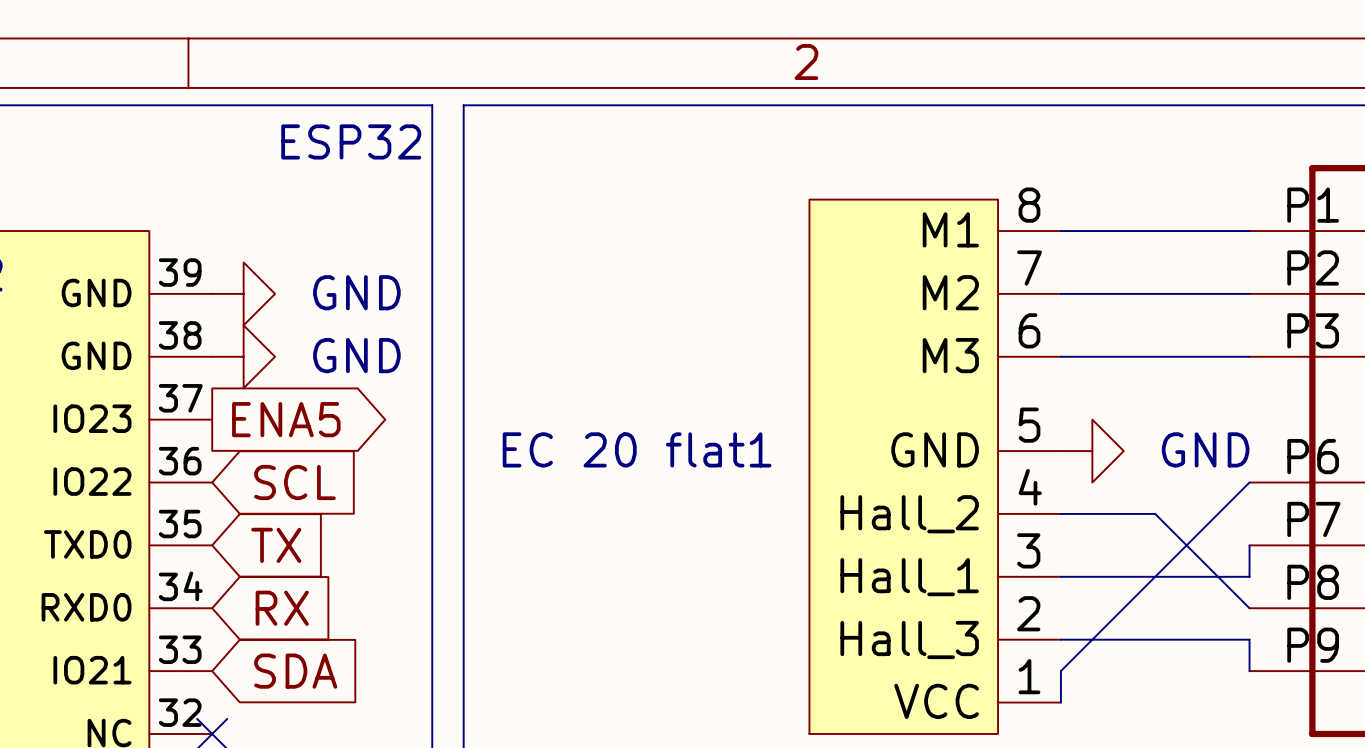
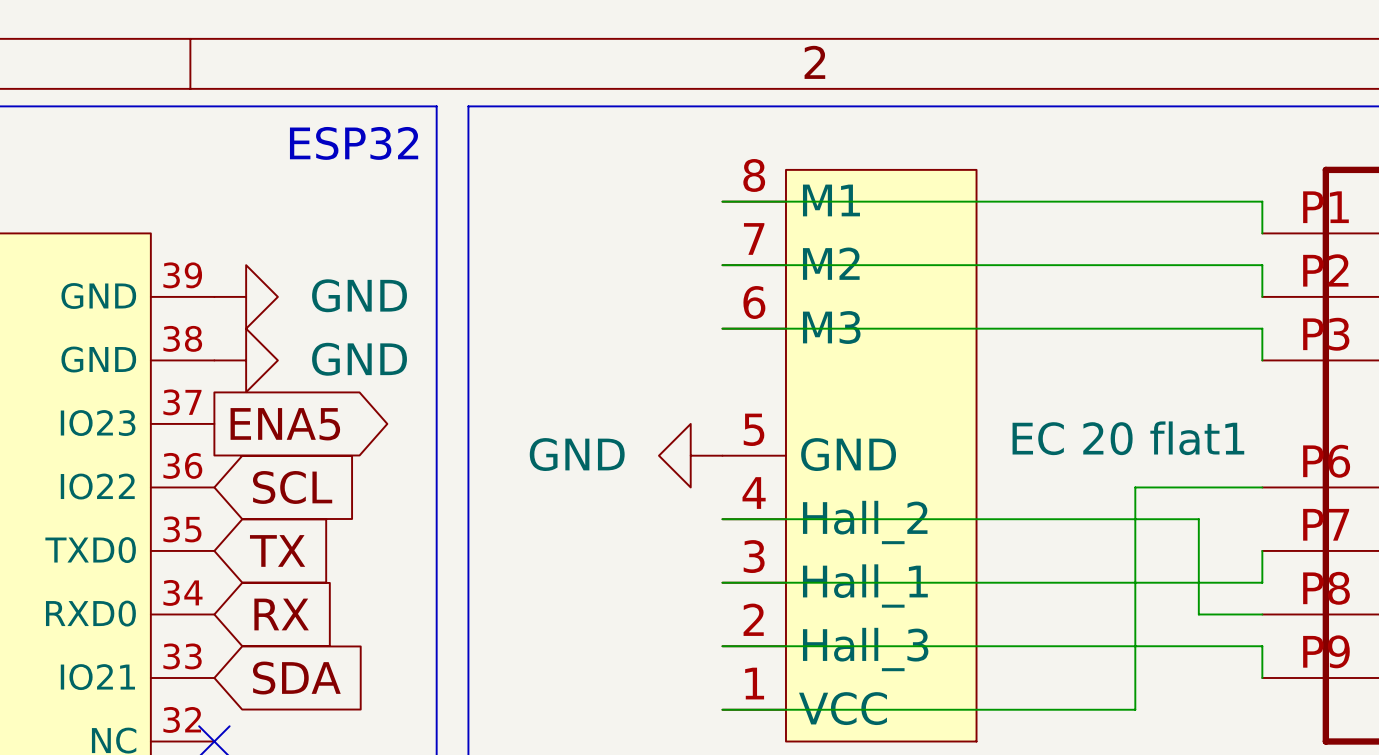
EC 20 flat1 symbol: [809, 199, 1061, 734] -> [722, 169, 977, 742]
wire: (1060, 231) (1249, 231) -> (722, 201) (1262, 201) (1262, 233)
wire: (1060, 293) (1249, 293) -> (722, 265) (1262, 265) (1262, 296)
wire: (1060, 356) (1249, 356) -> (722, 328) (1262, 328) (1262, 360)
EC 20 flat1 name position: EC 20 flat1 (637, 449) -> EC 20 flat1 (1128, 438)
power symbol rotation: 0° (1092, 451) -> 180° (690, 455)
power symbol position: GND (1092, 451) -> GND (690, 455)
wire: (1249, 482) (1060, 671) (1060, 702) -> (1262, 487) (1135, 487) (1135, 709) (722, 709)
wire: (1155, 513) (1249, 608) -> (1167, 519) (1198, 519) (1198, 614) (1262, 614)

